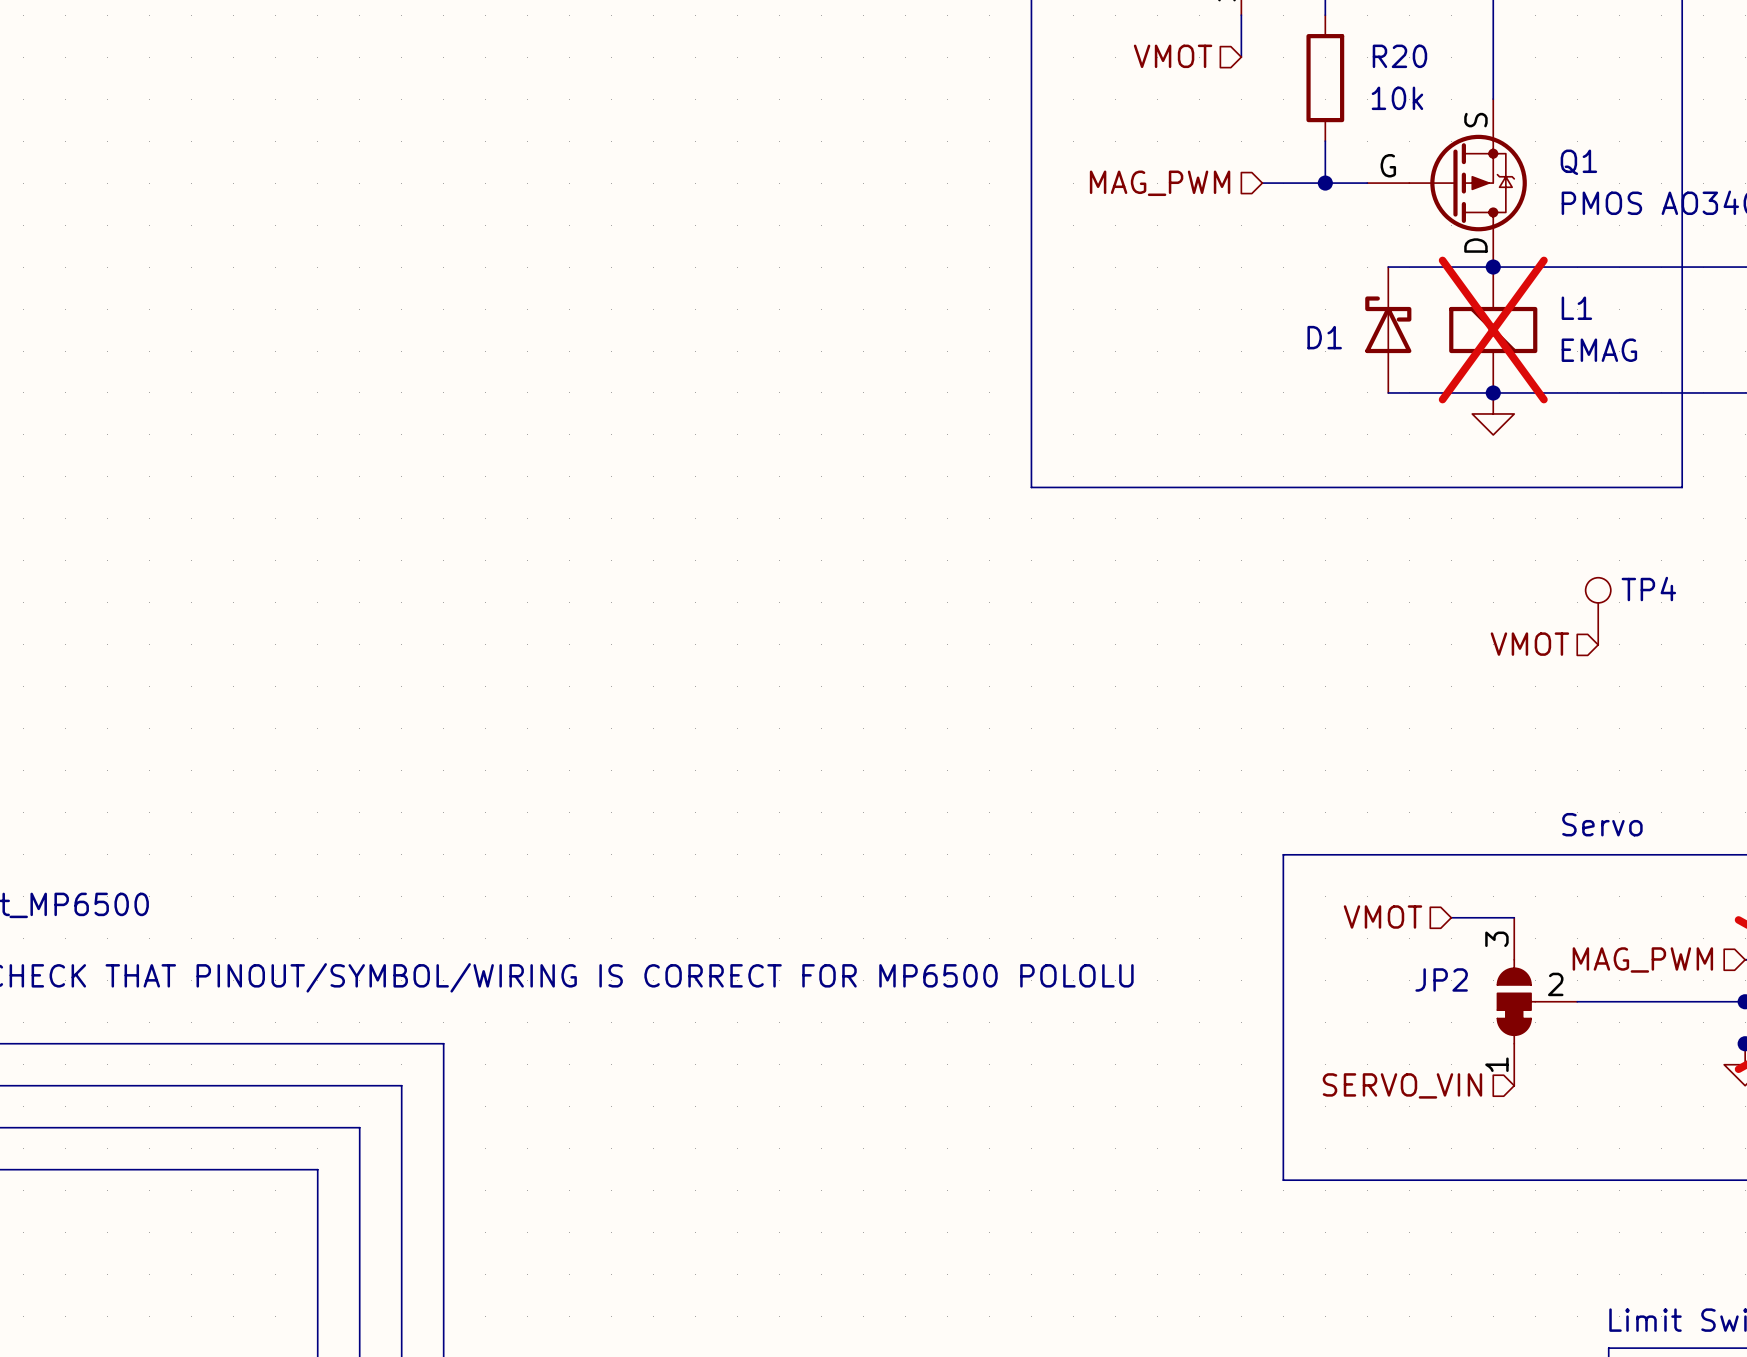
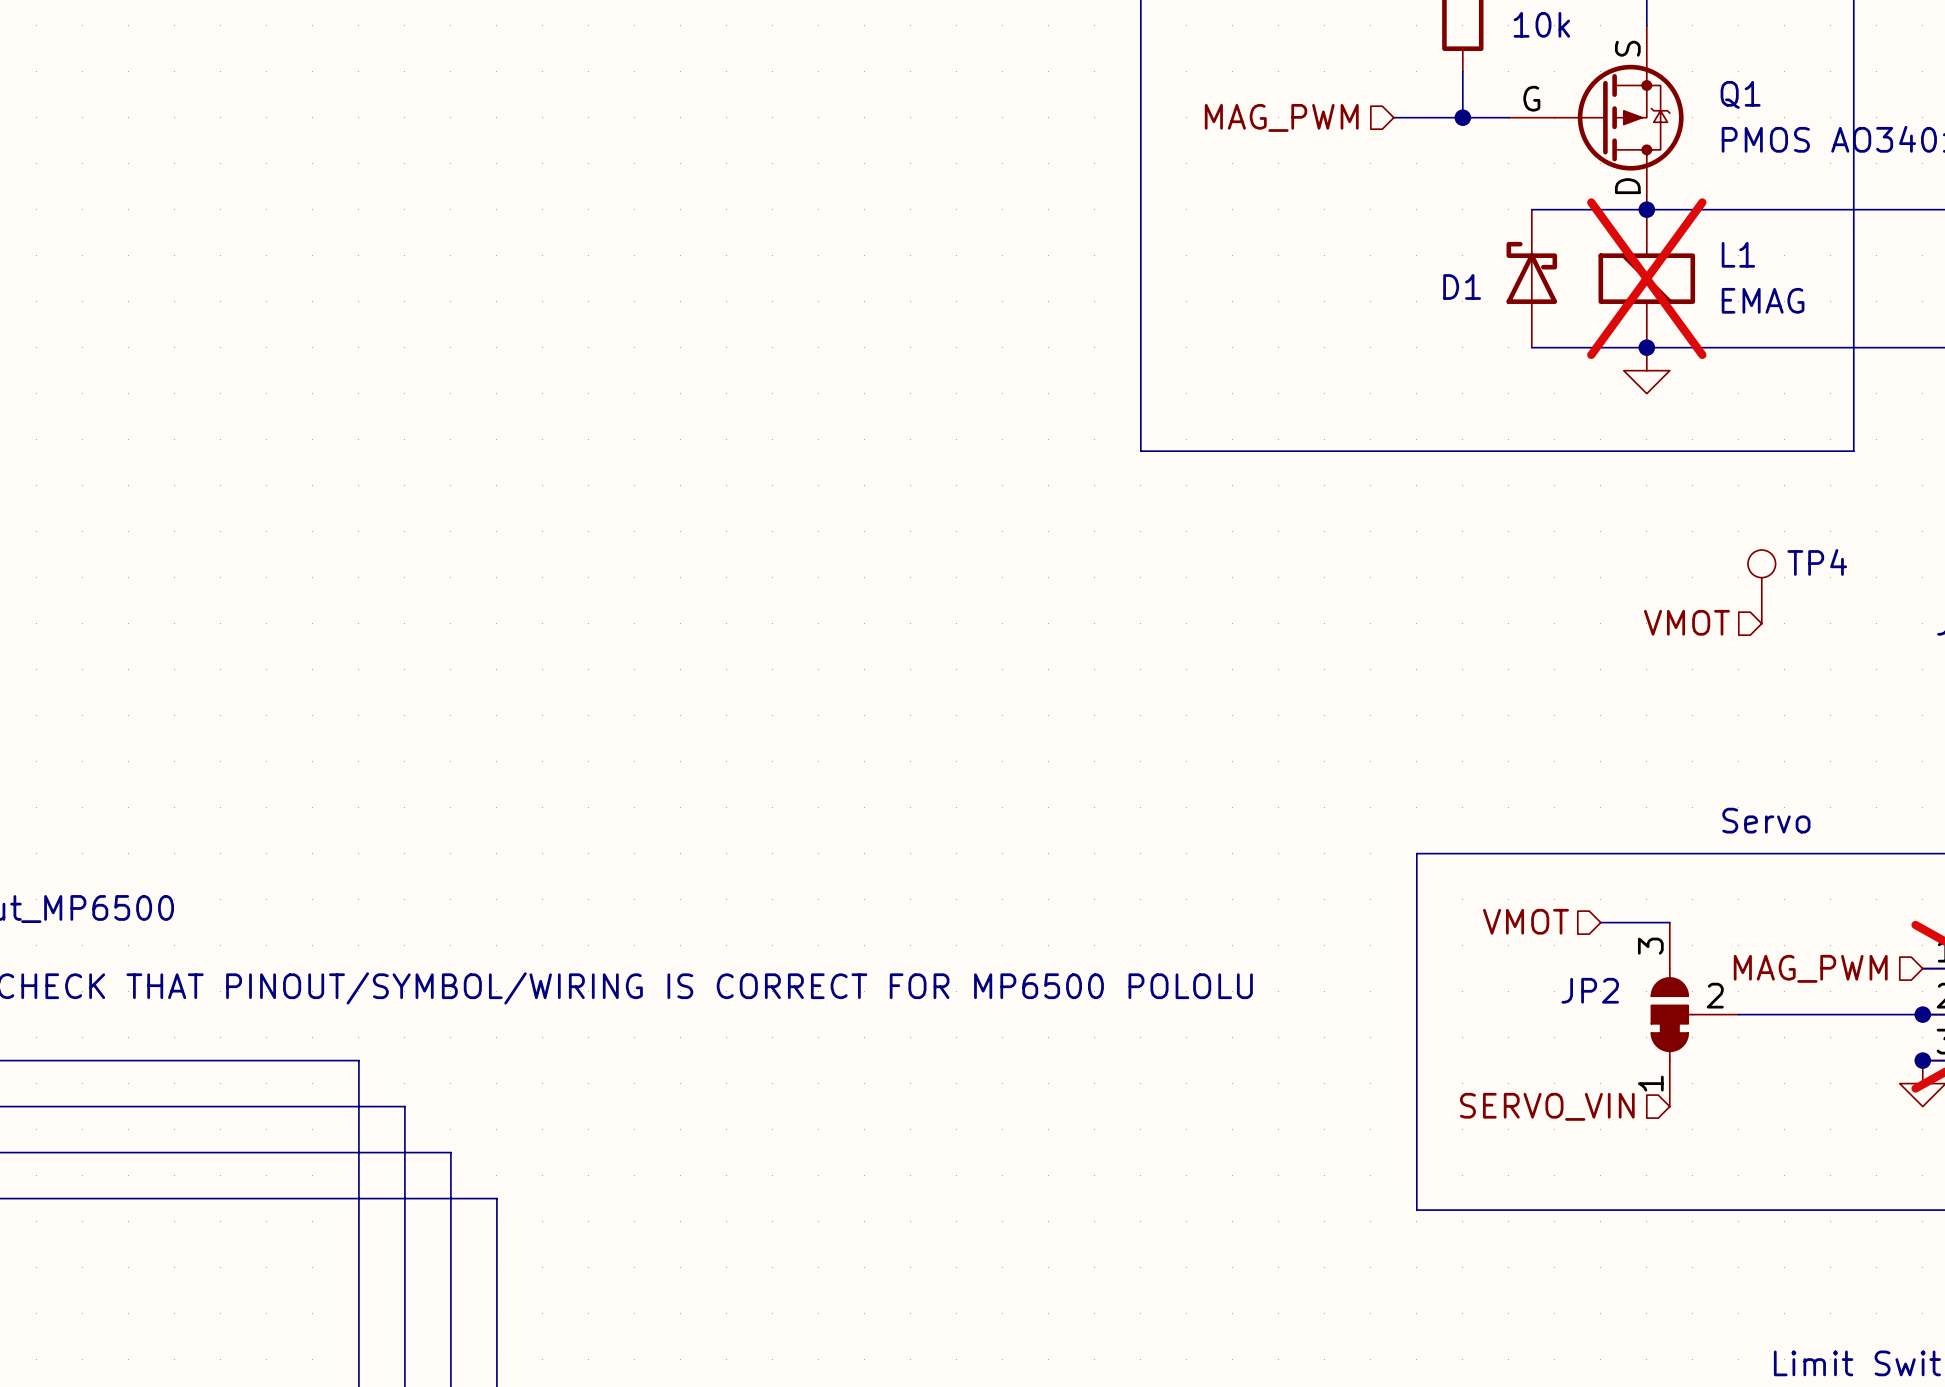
wire: (317, 1043) (443, 1043) (443, 1169) -> (358, 1060) (358, 1198) (496, 1198)
wire: (359, 1085) (401, 1085) (401, 1127) -> (404, 1106) (404, 1152) (450, 1152)

